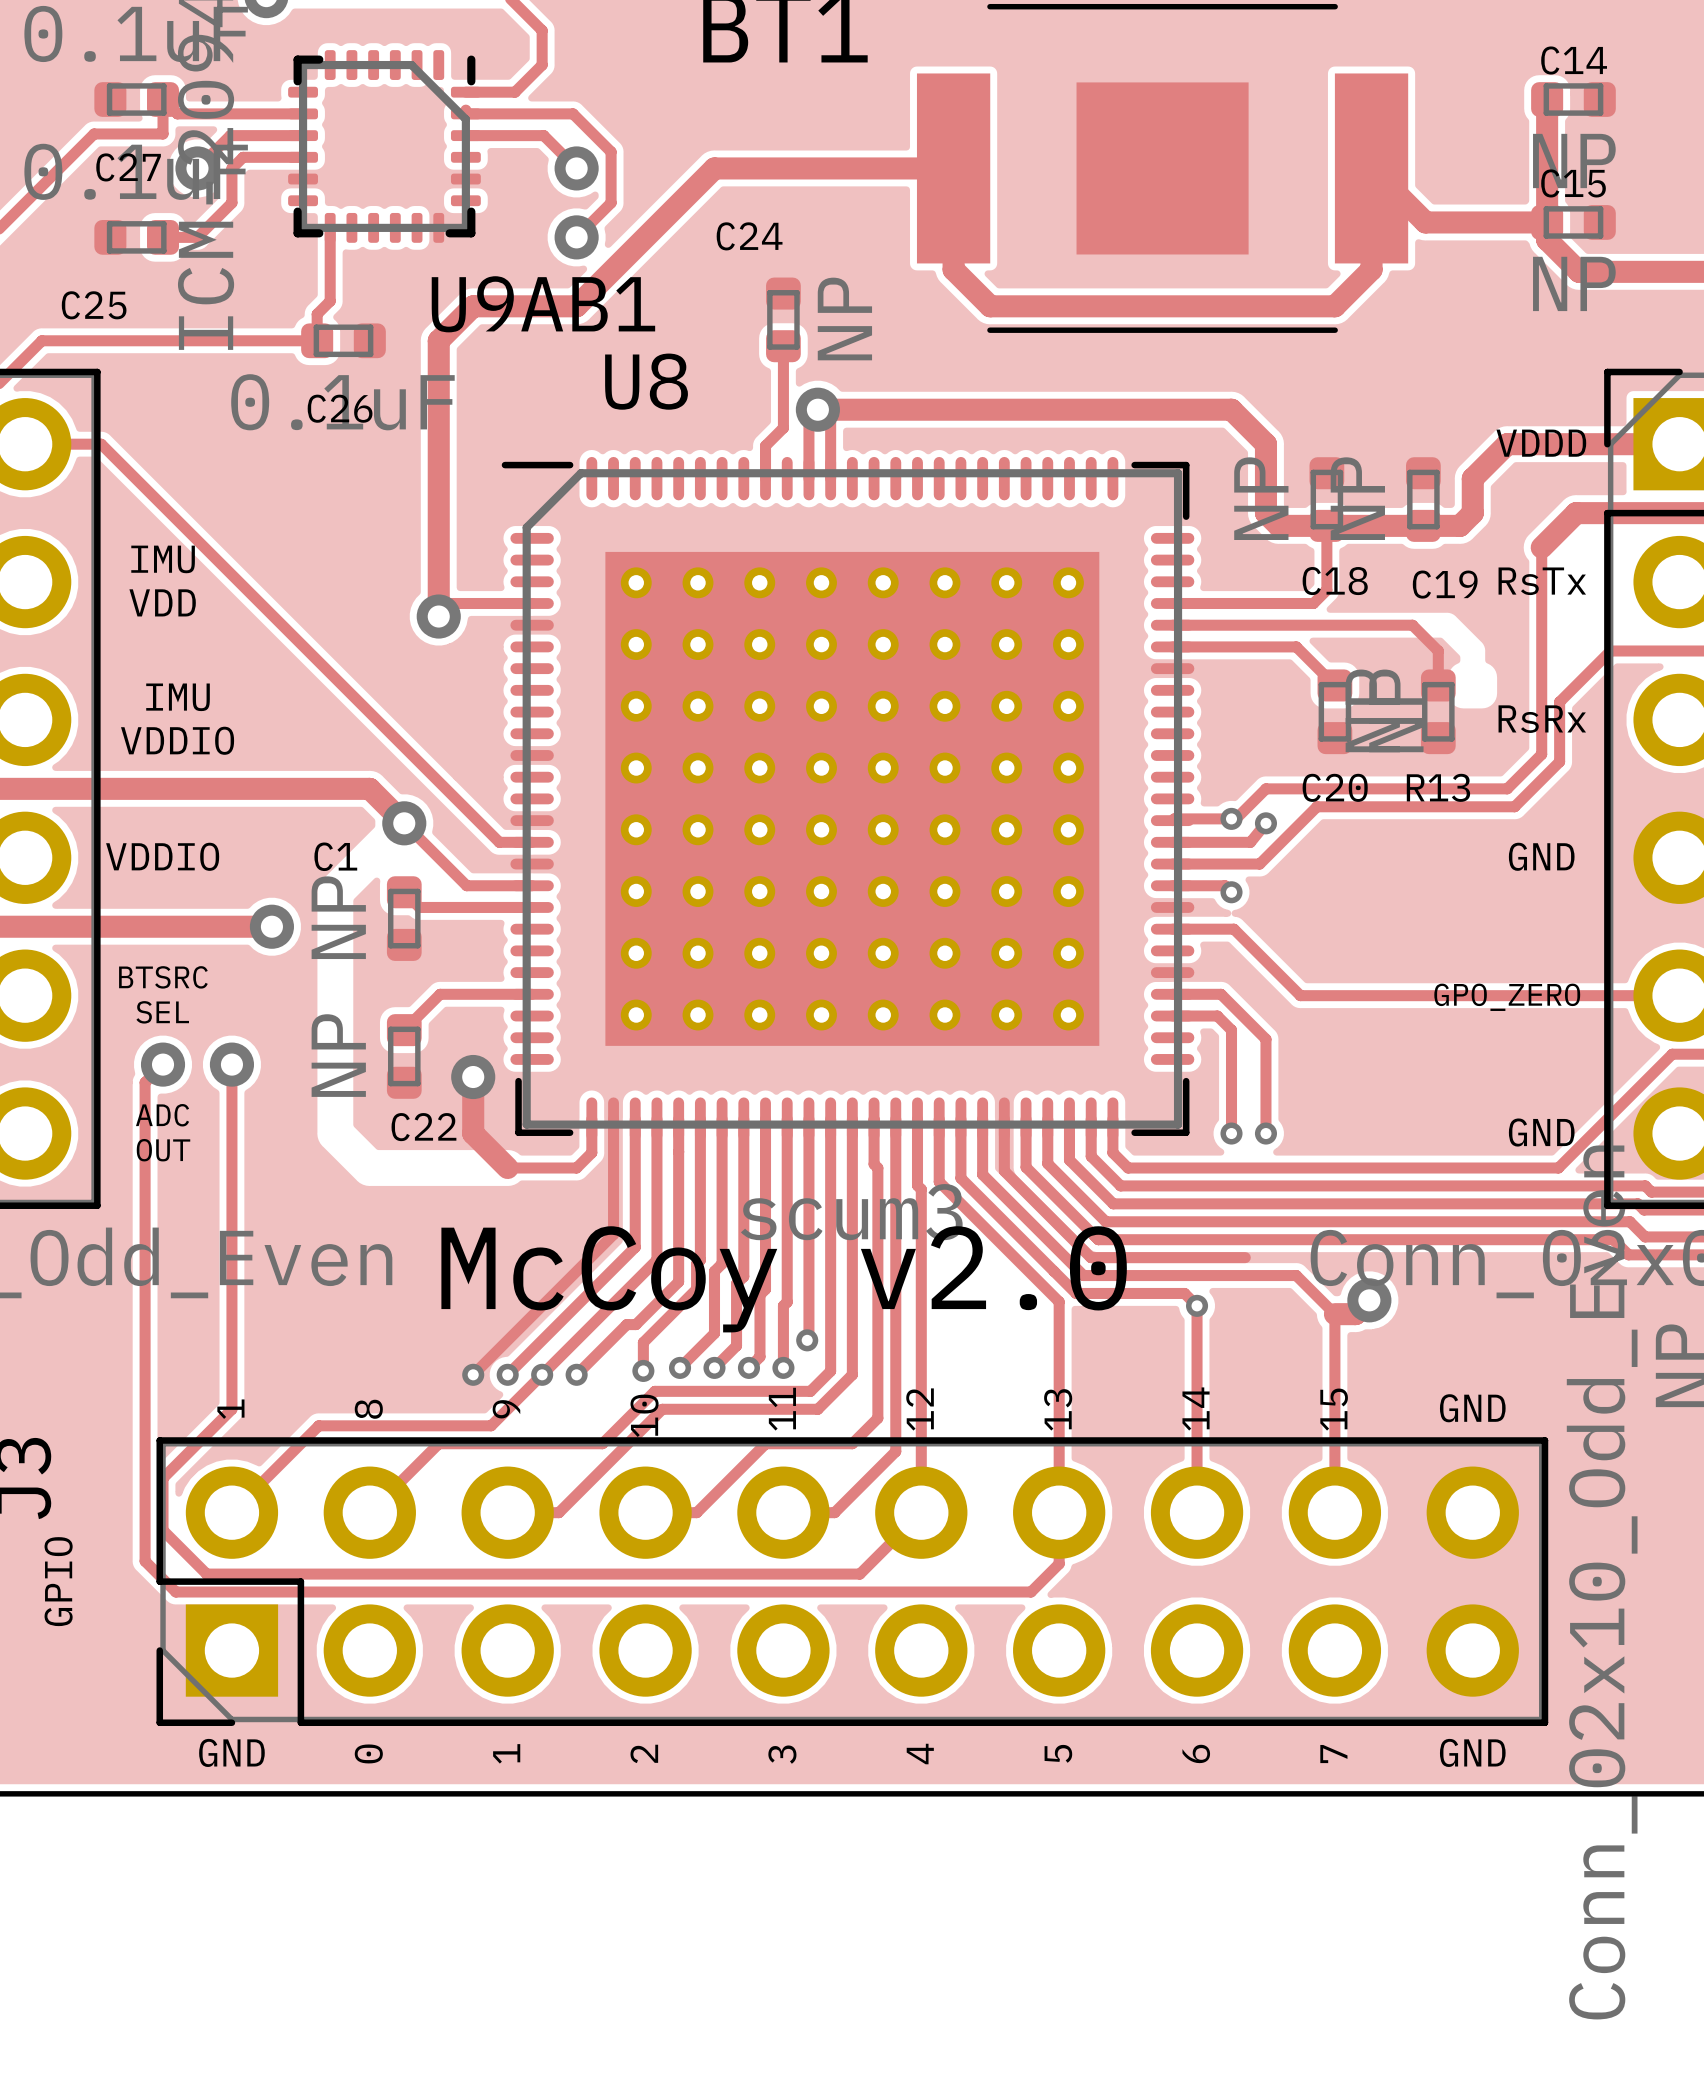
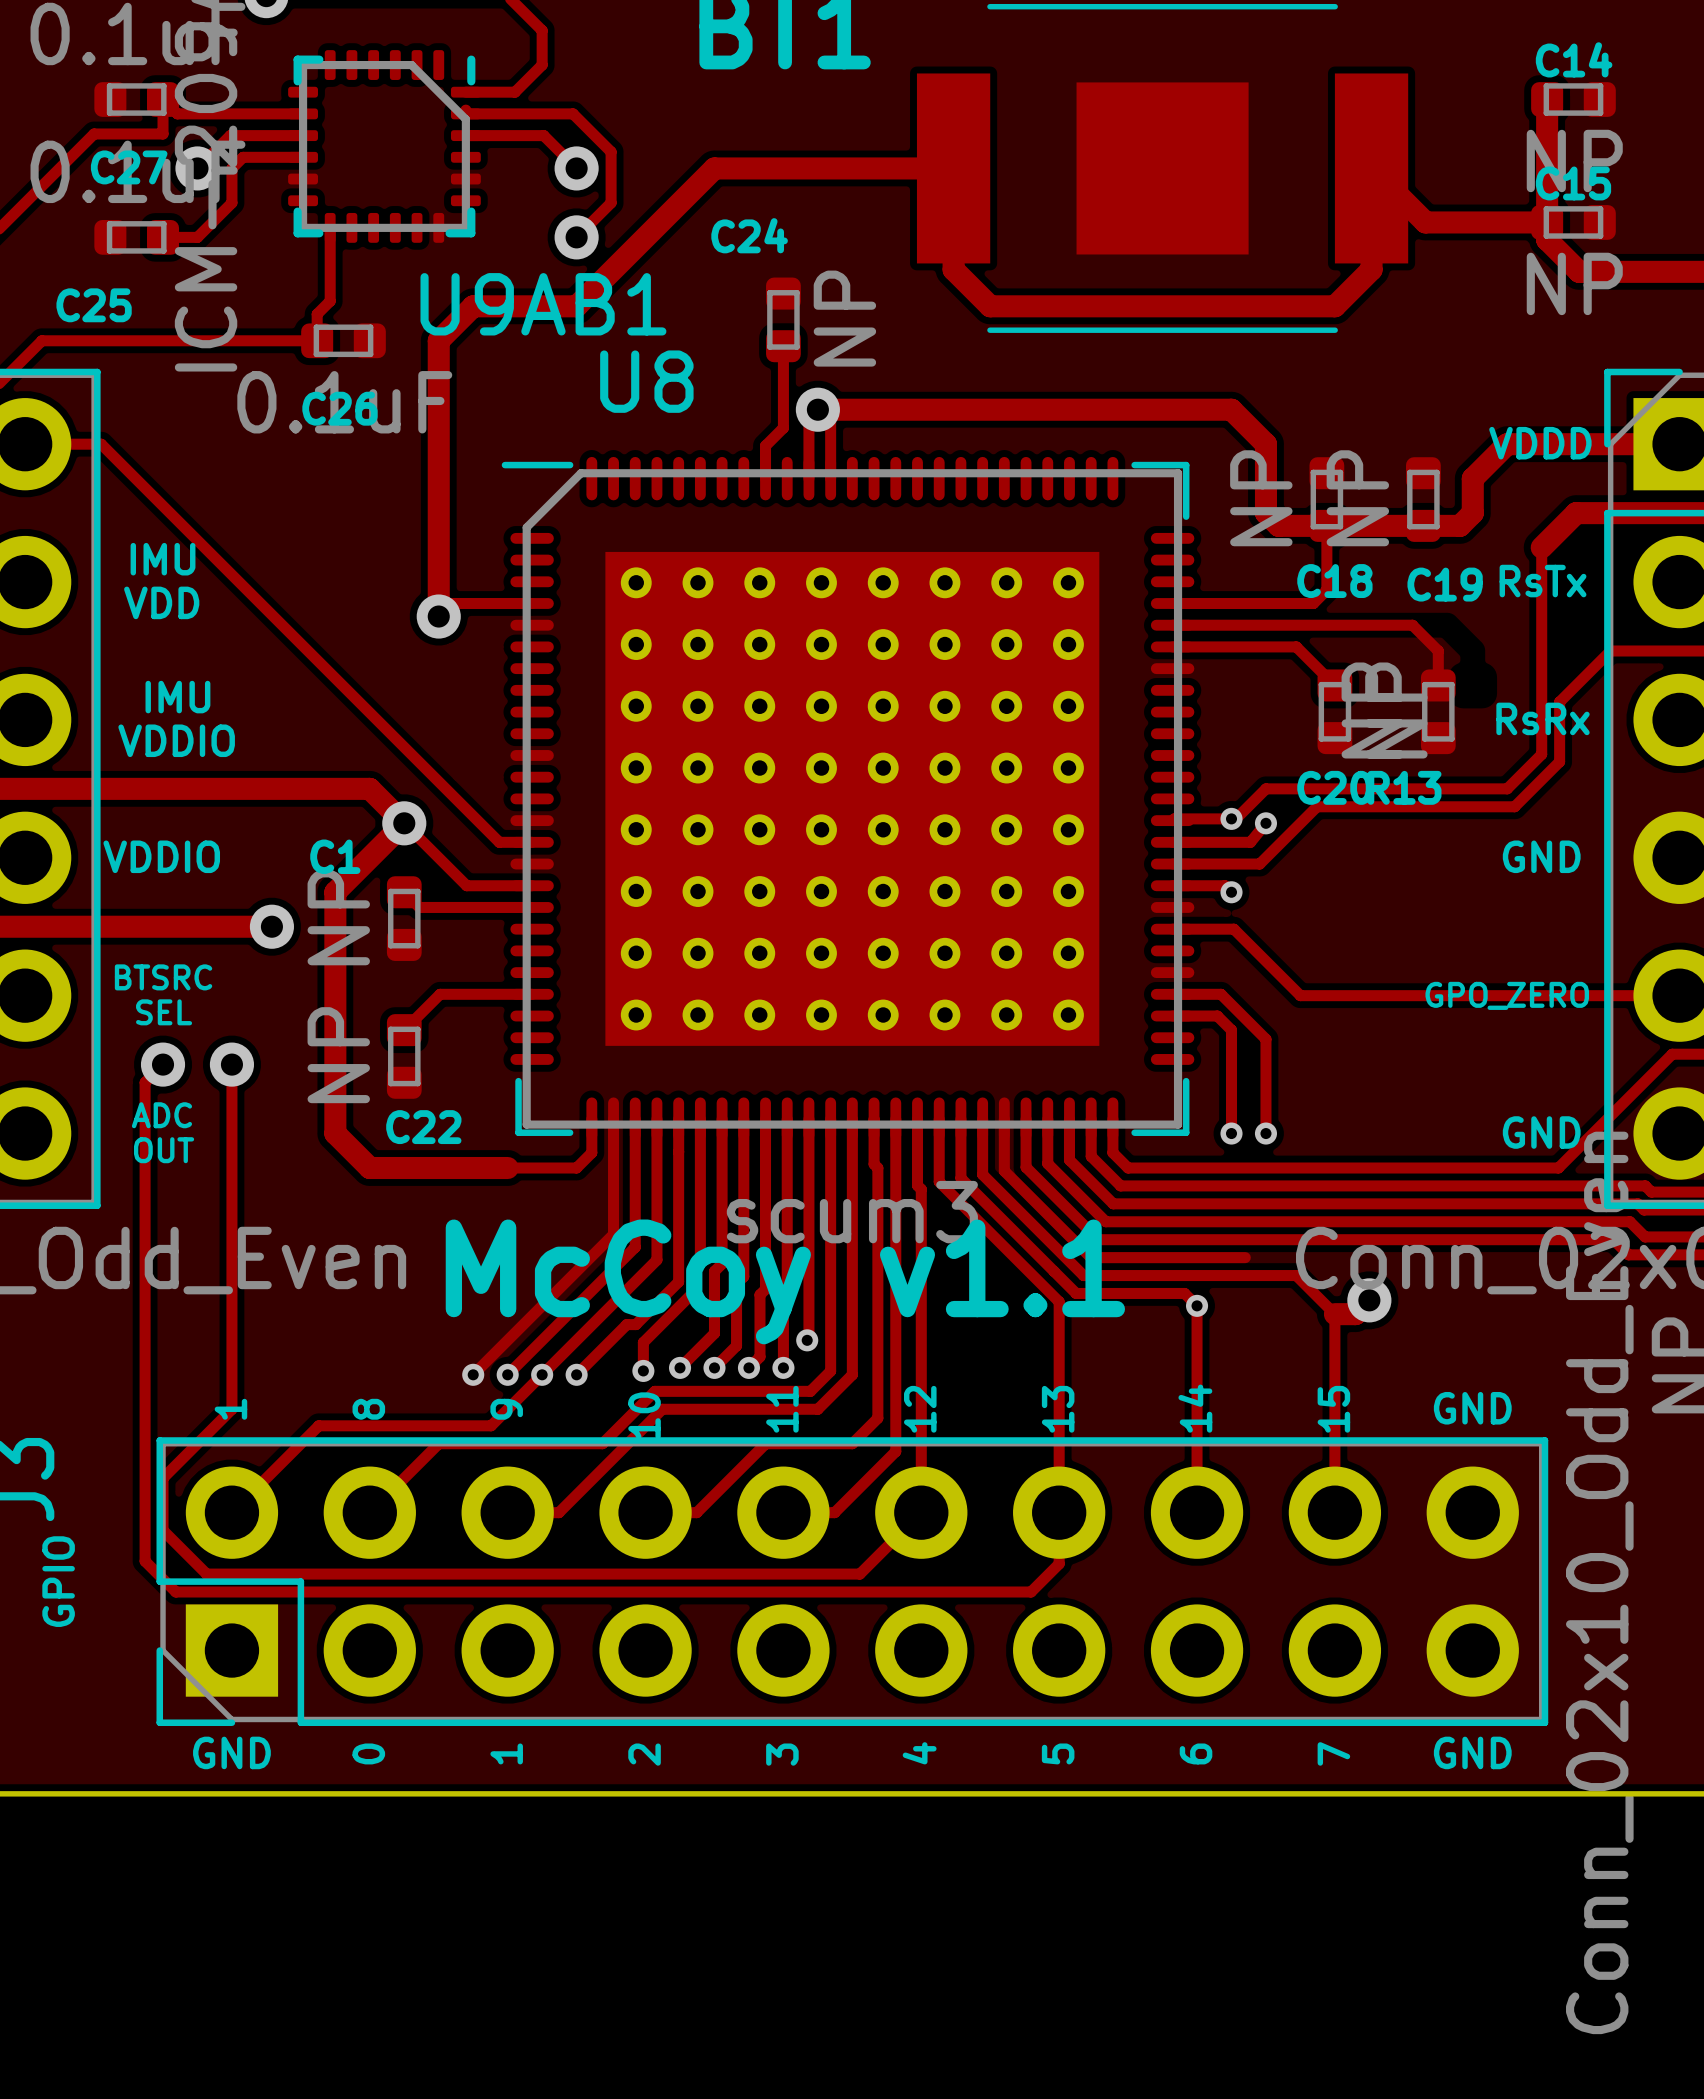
R13 name position: R13 (1438, 787) -> R13 (1404, 787)
track: (473, 1077) (473, 1133) (507, 1168) -> (404, 823) (335, 892) (335, 1133) (369, 1168) (507, 1168)
via: (473, 1077) -> none
text: McCoy v2.0 (784, 1279) -> McCoy v1.1 (785, 1281)

